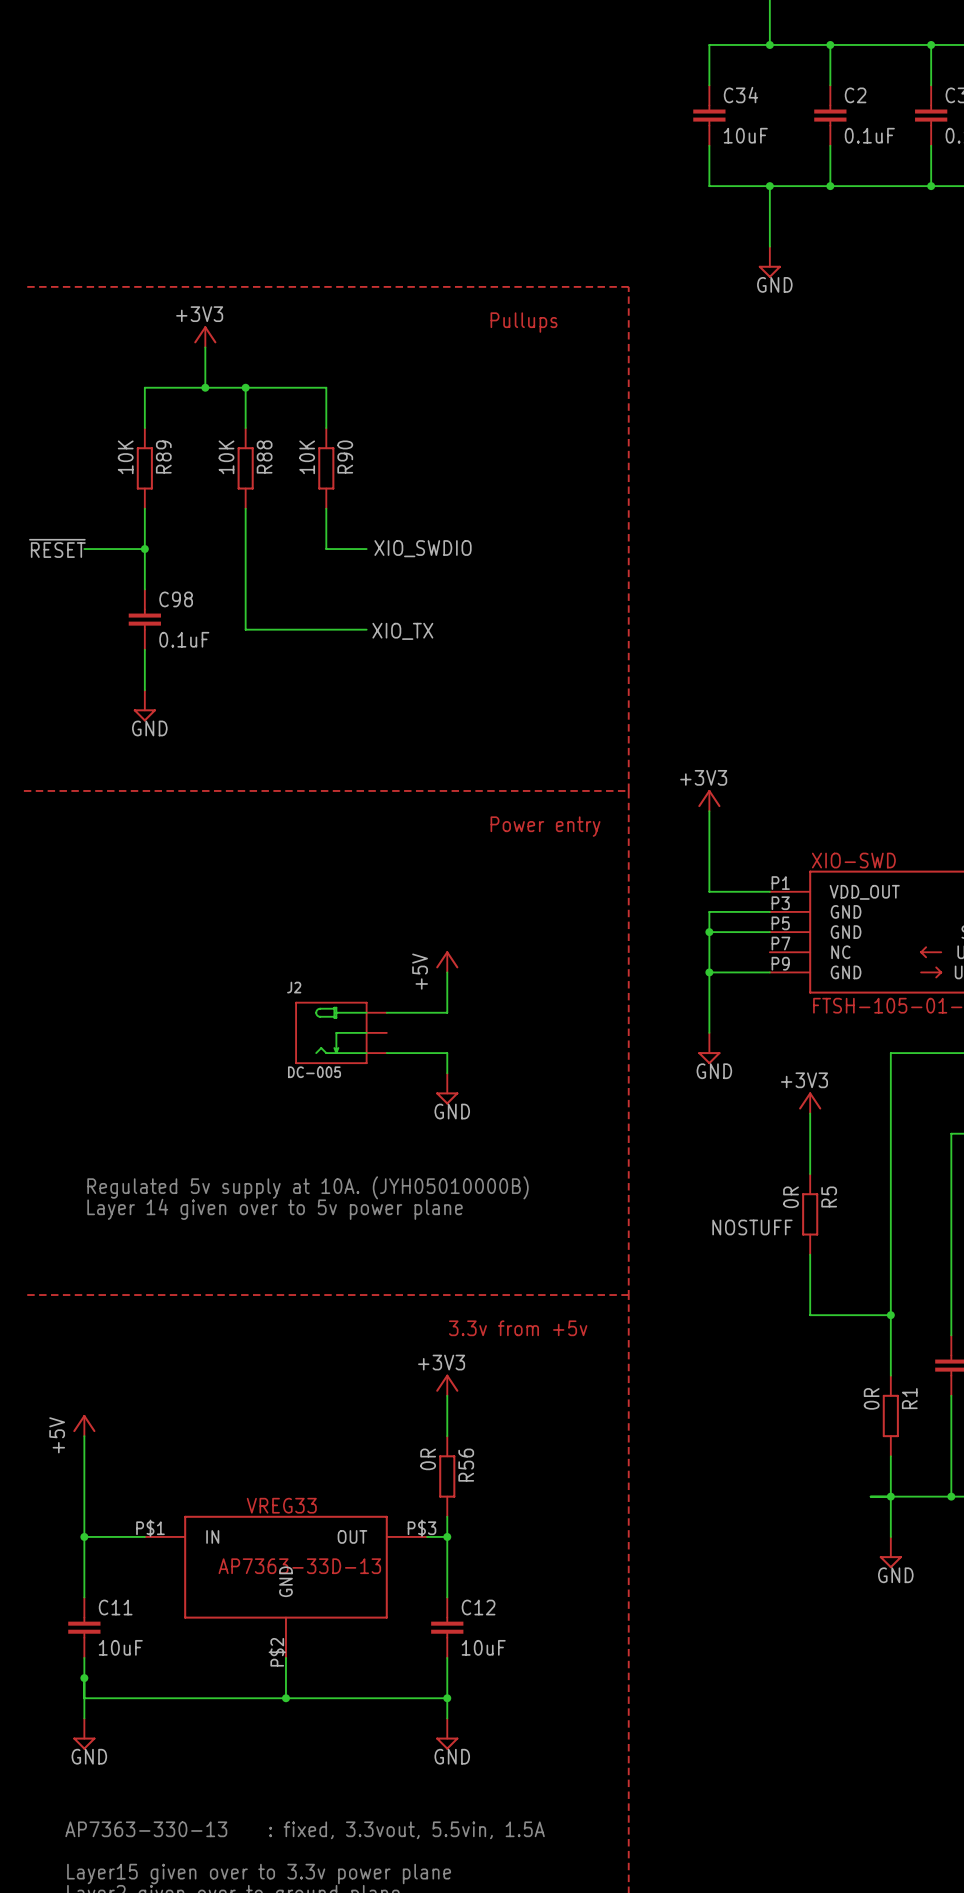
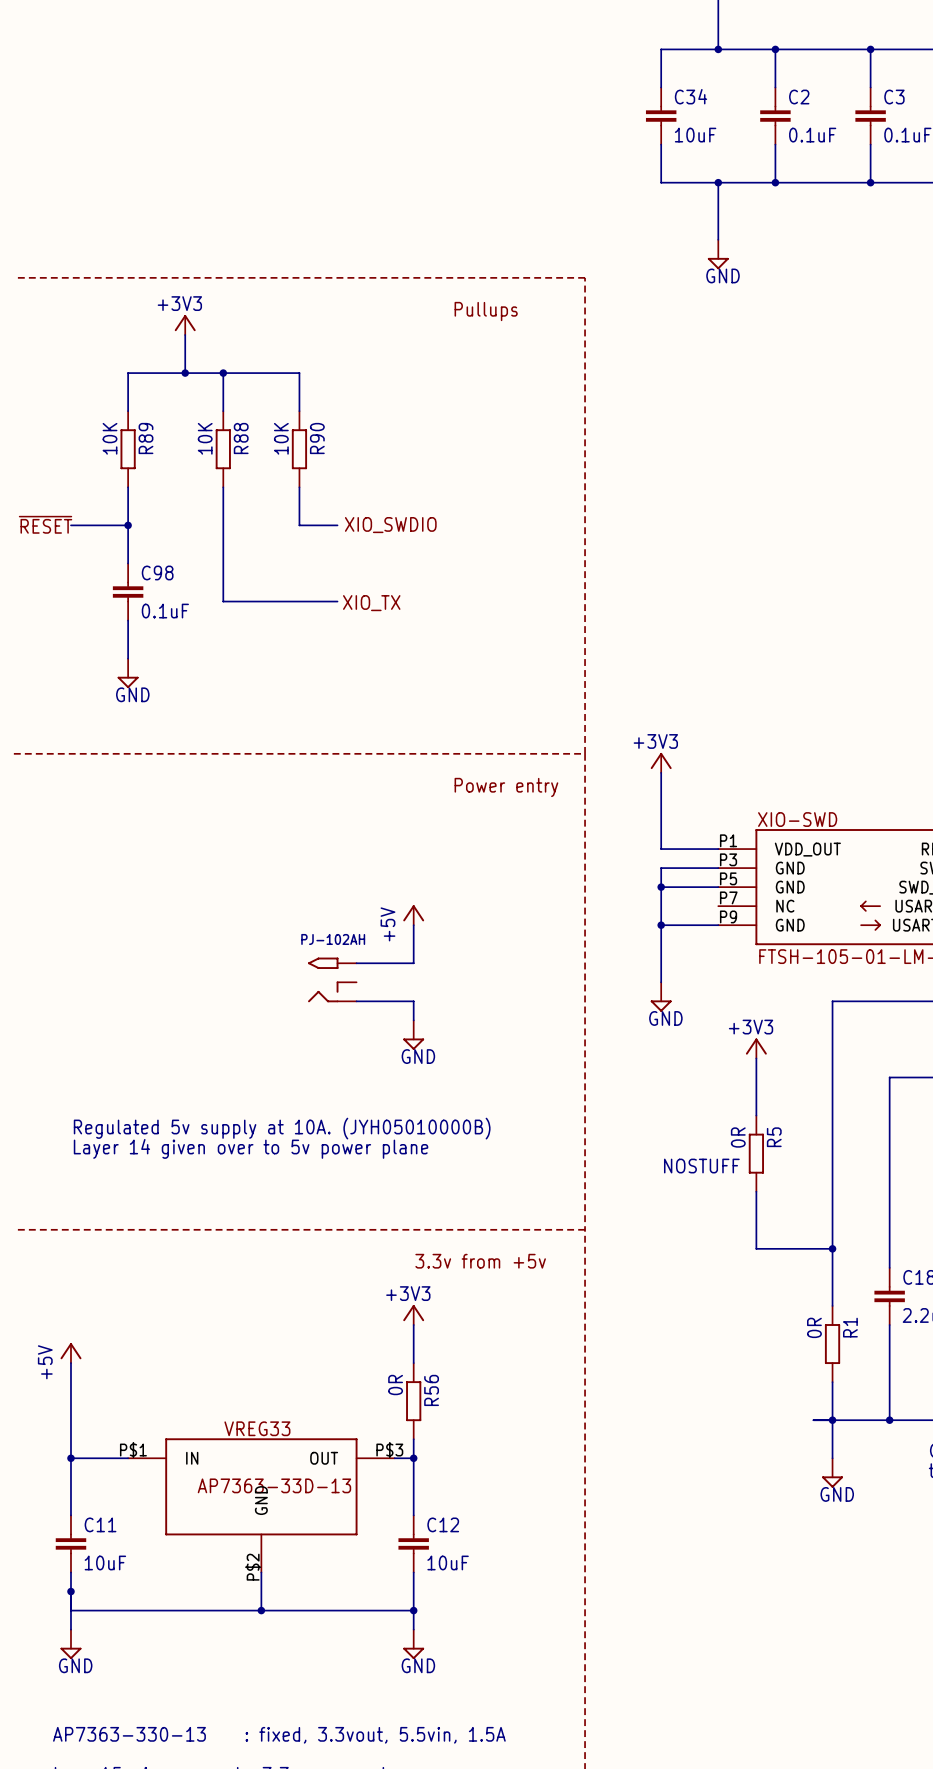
PJ-102AH: none -> (332, 979)
J2: DC-005 (341, 1032) -> none

